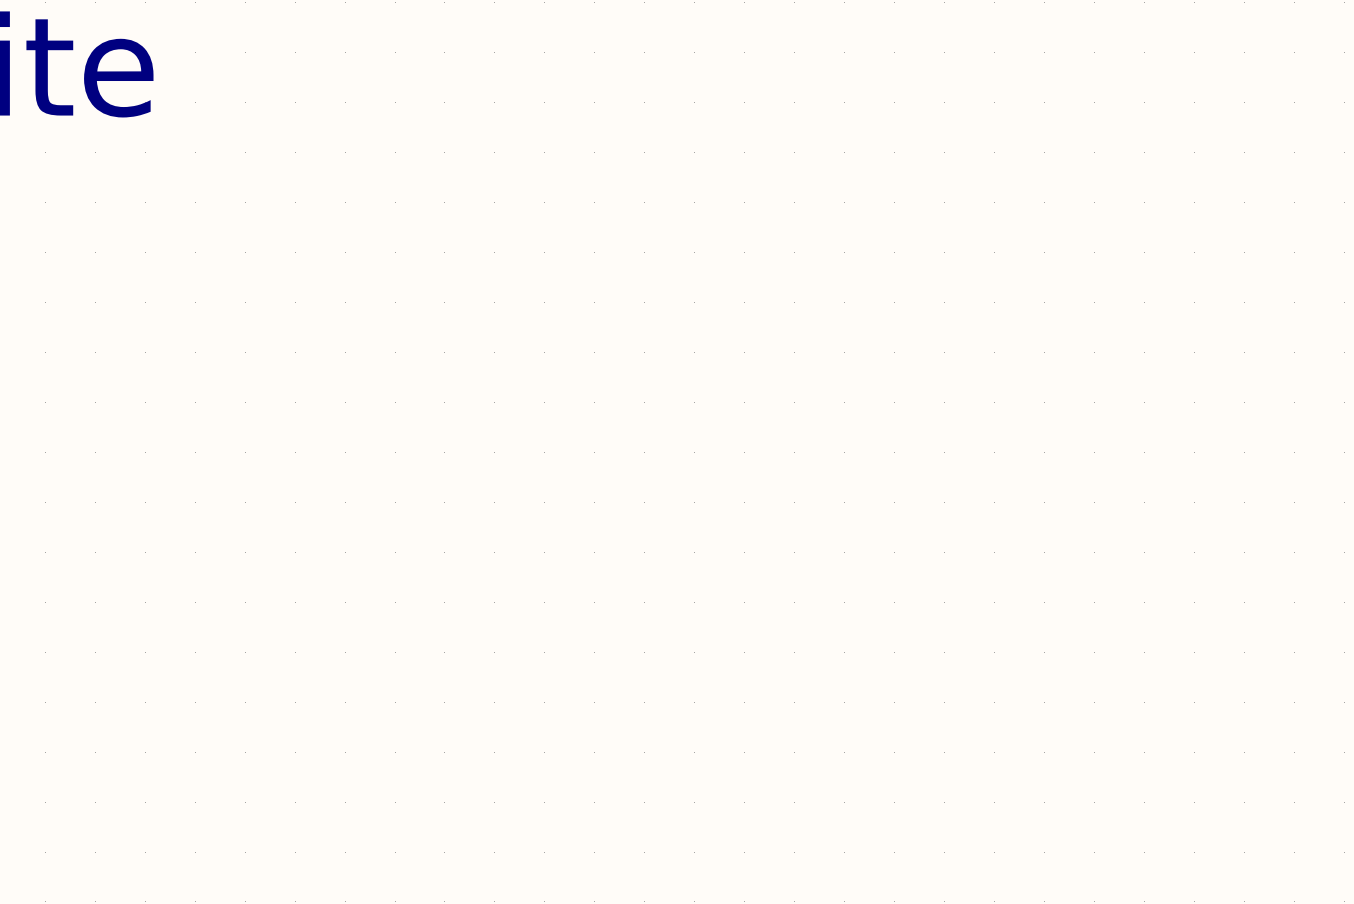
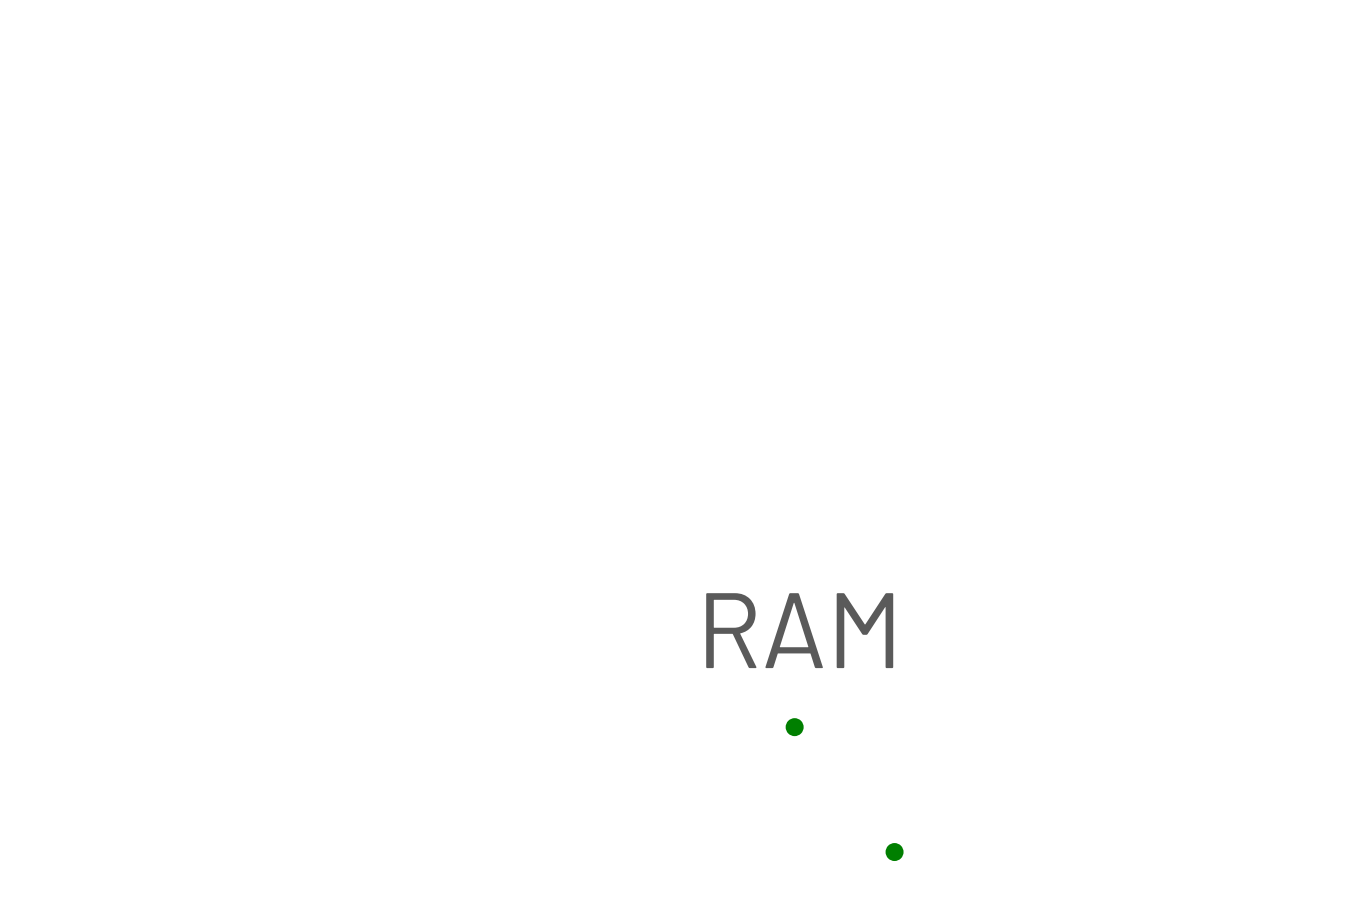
text: none -> RAM (799, 630)
junction: none -> (794, 727)
junction: none -> (894, 852)

